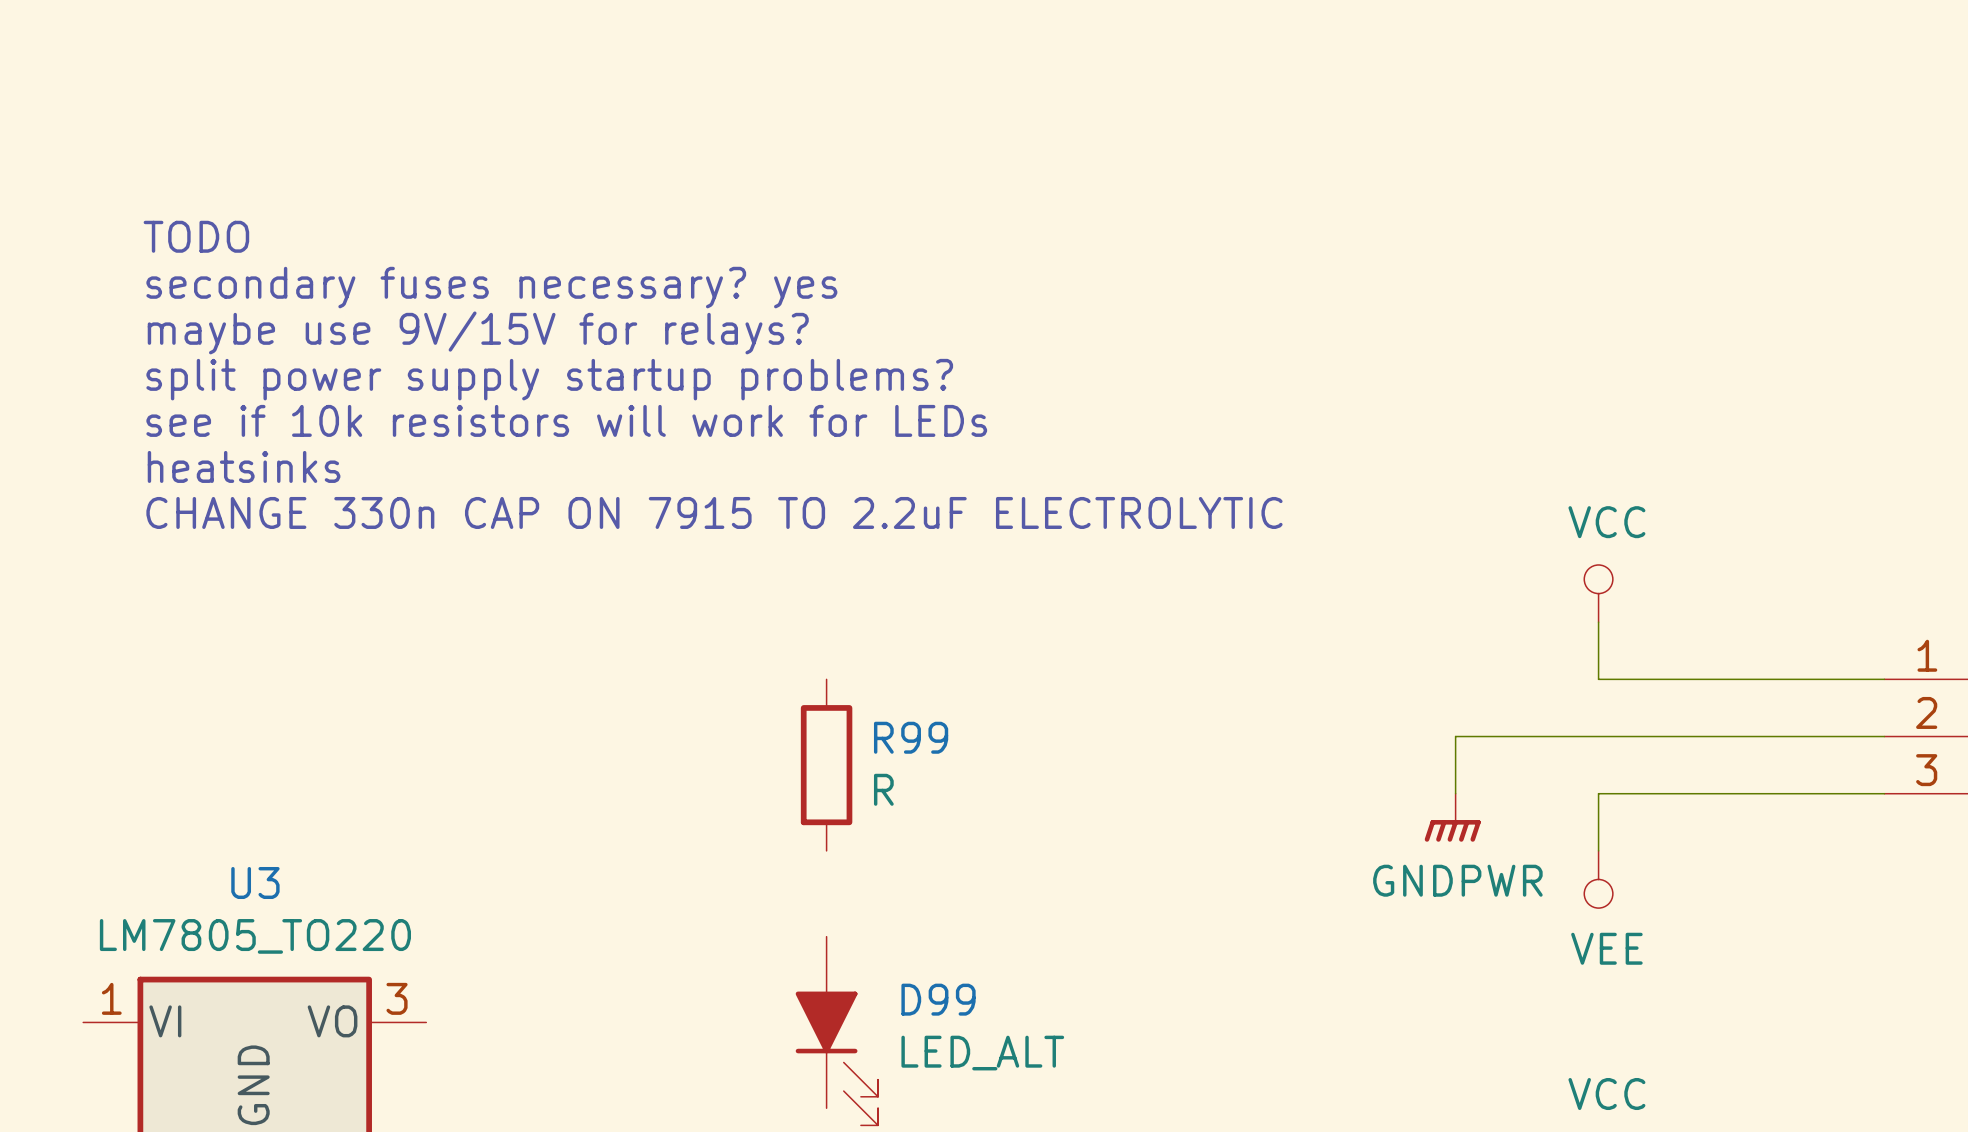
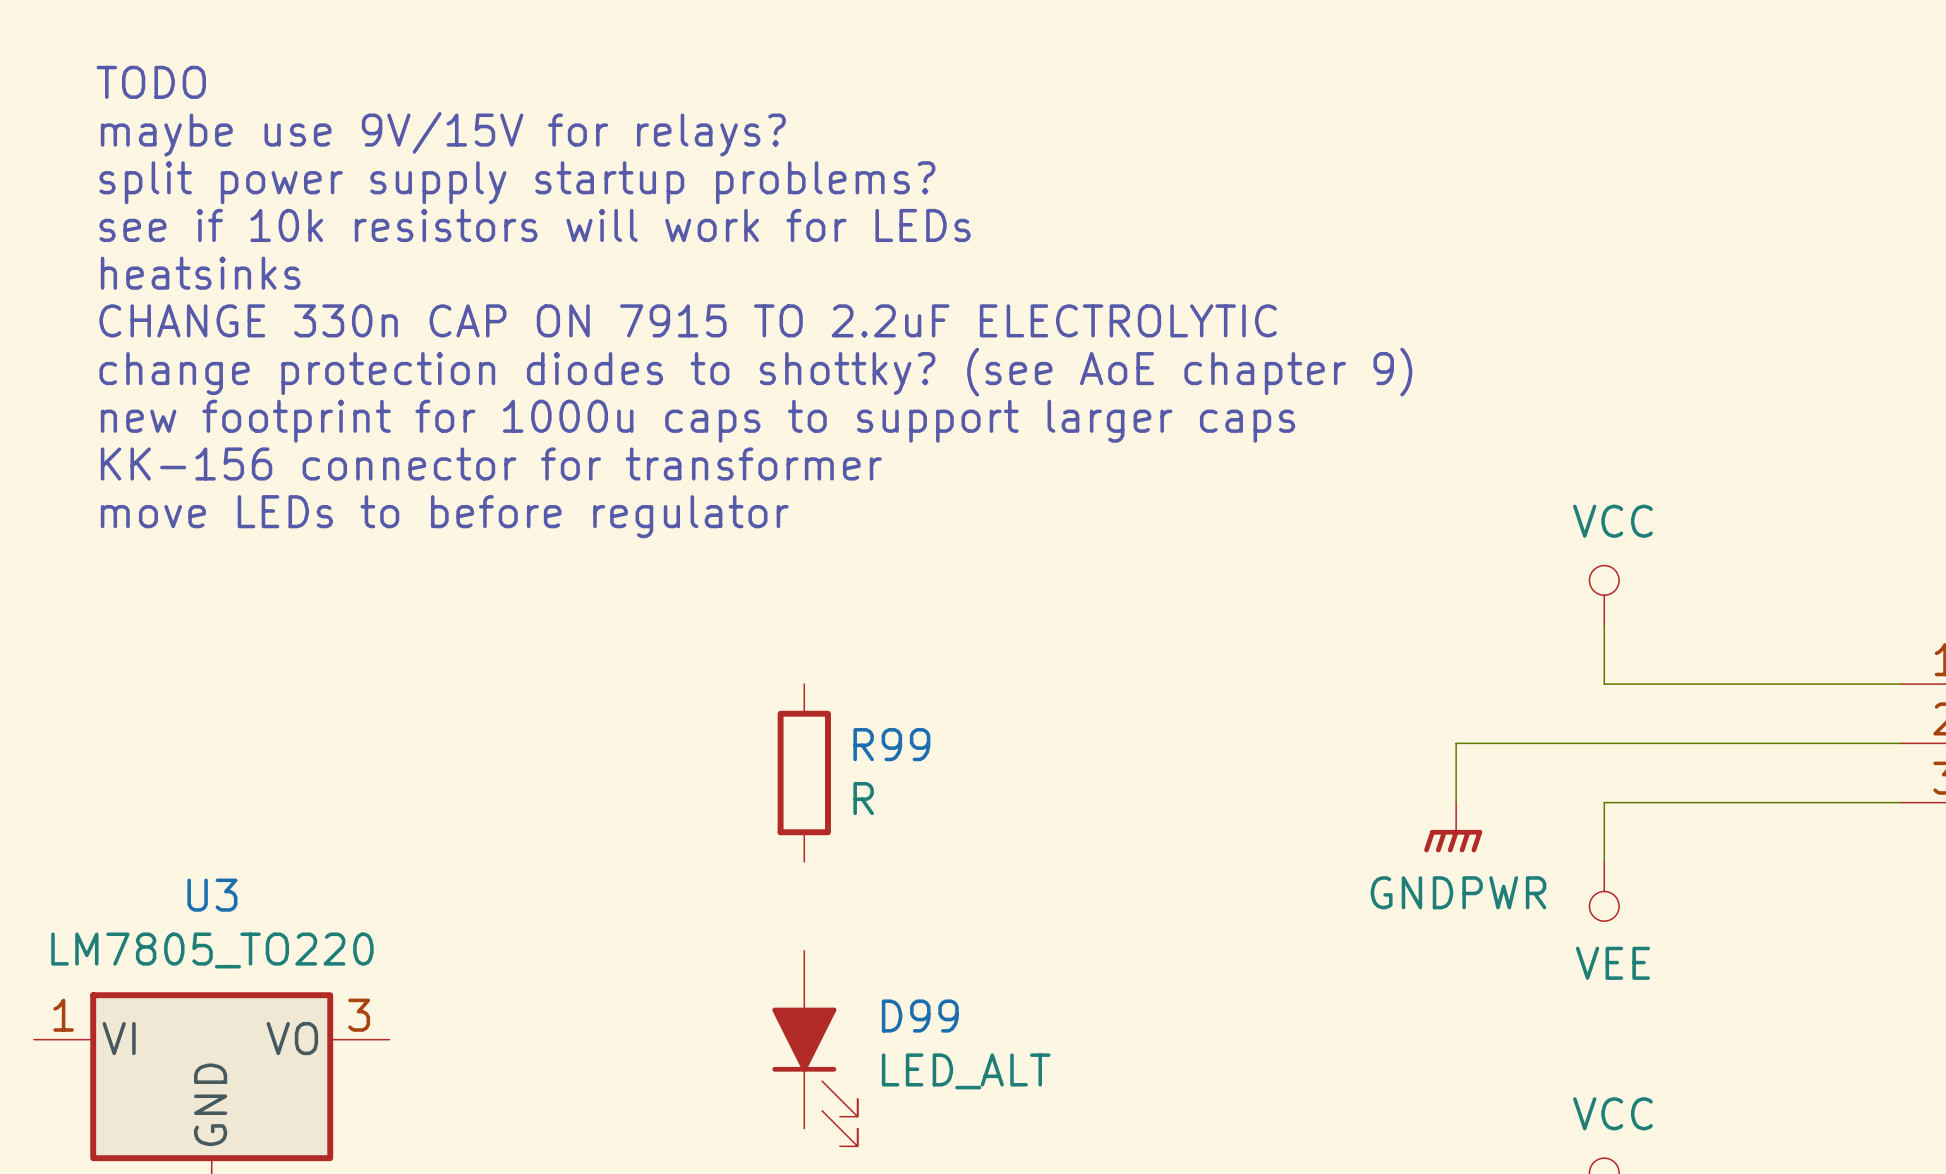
text: none -> TODO (151, 82)
text: none -> maybe use 9V/15V for relays? (443, 134)
text: none -> split power supply startup problems? (517, 182)
text: TODO (196, 236) -> see if 10k resistors will work for LEDs (535, 225)
text: secondary fuses necessary? yes (491, 287) -> heatsinks (200, 273)
text: maybe use 9V/15V for relays? (478, 332) -> CHANGE 330n CAP ON 7915 TO 2.2uF ELECTROLYTIC (688, 320)
text: split power supply startup problems? (549, 379) -> change protection diodes to shottky? (see AoE chapter 9) (755, 372)
text: see if 10k resistors will work for LEDs (566, 420) -> new footprint for 1000u caps to support larger caps (698, 421)
text: heatsinks (244, 466) -> KK-156 connector for transformer (491, 463)
text: CHANGE 330n CAP ON 7915 TO 2.2uF ELECTROLYTIC (714, 512) -> move LEDs to before regulator (444, 516)

